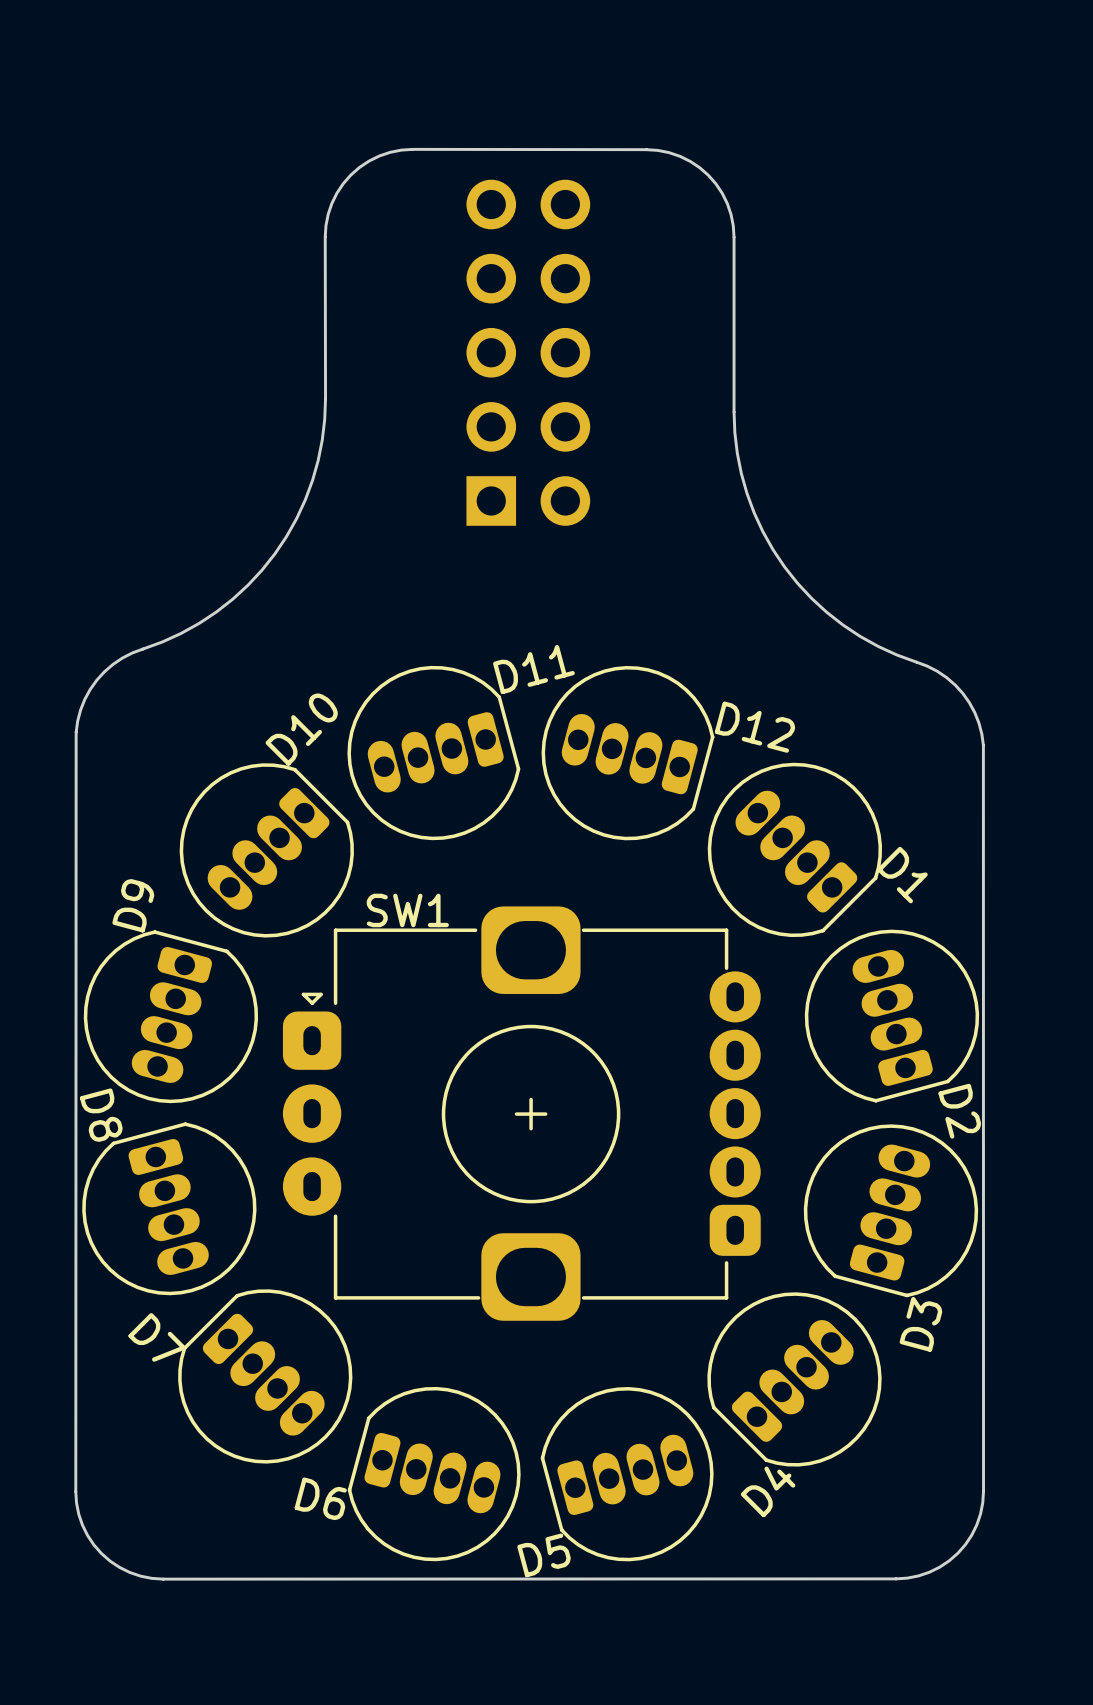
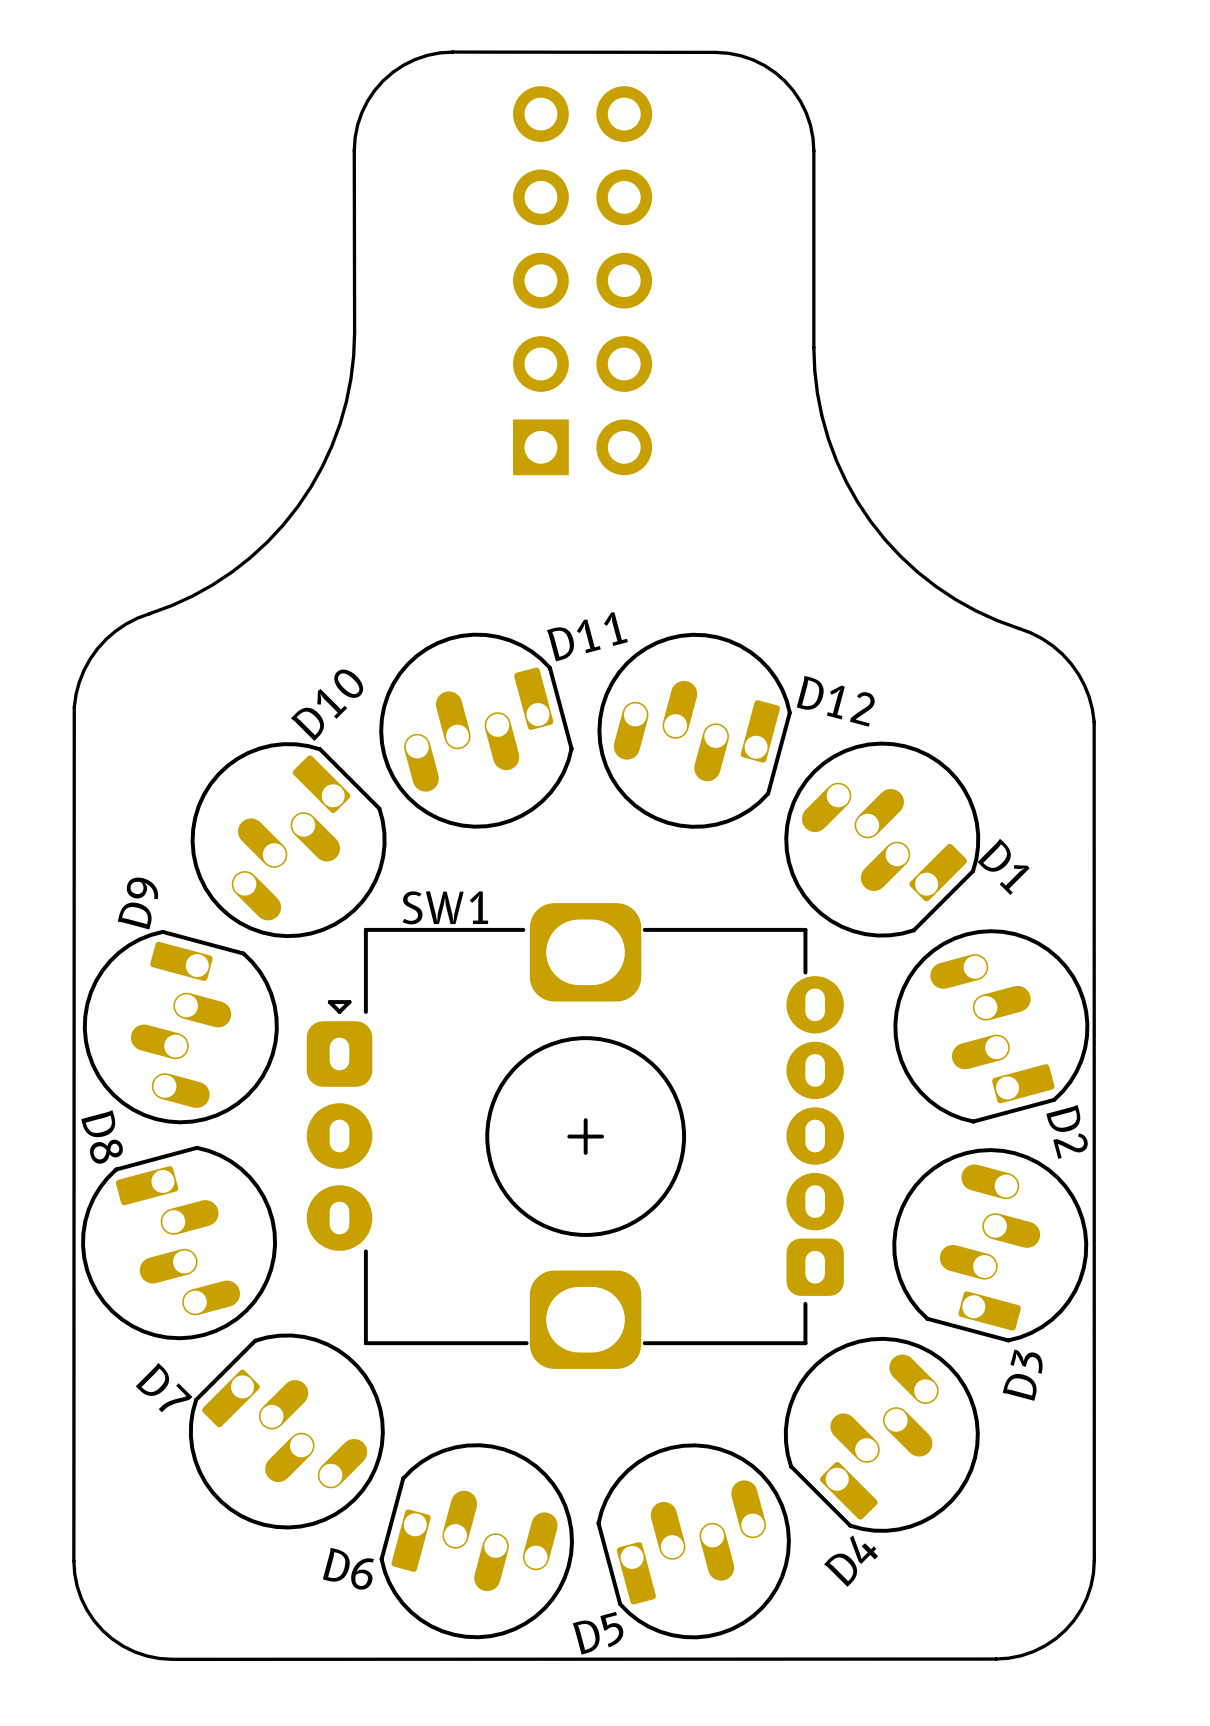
D11 footprint: [347, 665, 521, 841] -> [379, 632, 574, 829]
D12 footprint: [541, 665, 715, 841] -> [597, 632, 792, 829]
D1 footprint: [707, 762, 883, 938] -> [784, 741, 981, 938]
D10 footprint: [179, 763, 354, 938] -> [190, 742, 387, 939]
D2 footprint: [804, 929, 980, 1103] -> [893, 929, 1090, 1124]
D9 footprint: [83, 930, 259, 1104] -> [82, 929, 279, 1125]
D8 footprint: [82, 1122, 257, 1296] -> [81, 1145, 278, 1341]
D3 footprint: [803, 1124, 979, 1298] -> [892, 1148, 1089, 1343]
D7 footprint: [178, 1289, 353, 1464] -> [188, 1333, 385, 1530]
D4 footprint: [707, 1292, 882, 1467] -> [783, 1336, 980, 1533]
D6 footprint: [347, 1386, 521, 1562] -> [379, 1443, 574, 1640]
D5 footprint: [540, 1387, 714, 1562] -> [596, 1443, 791, 1640]

